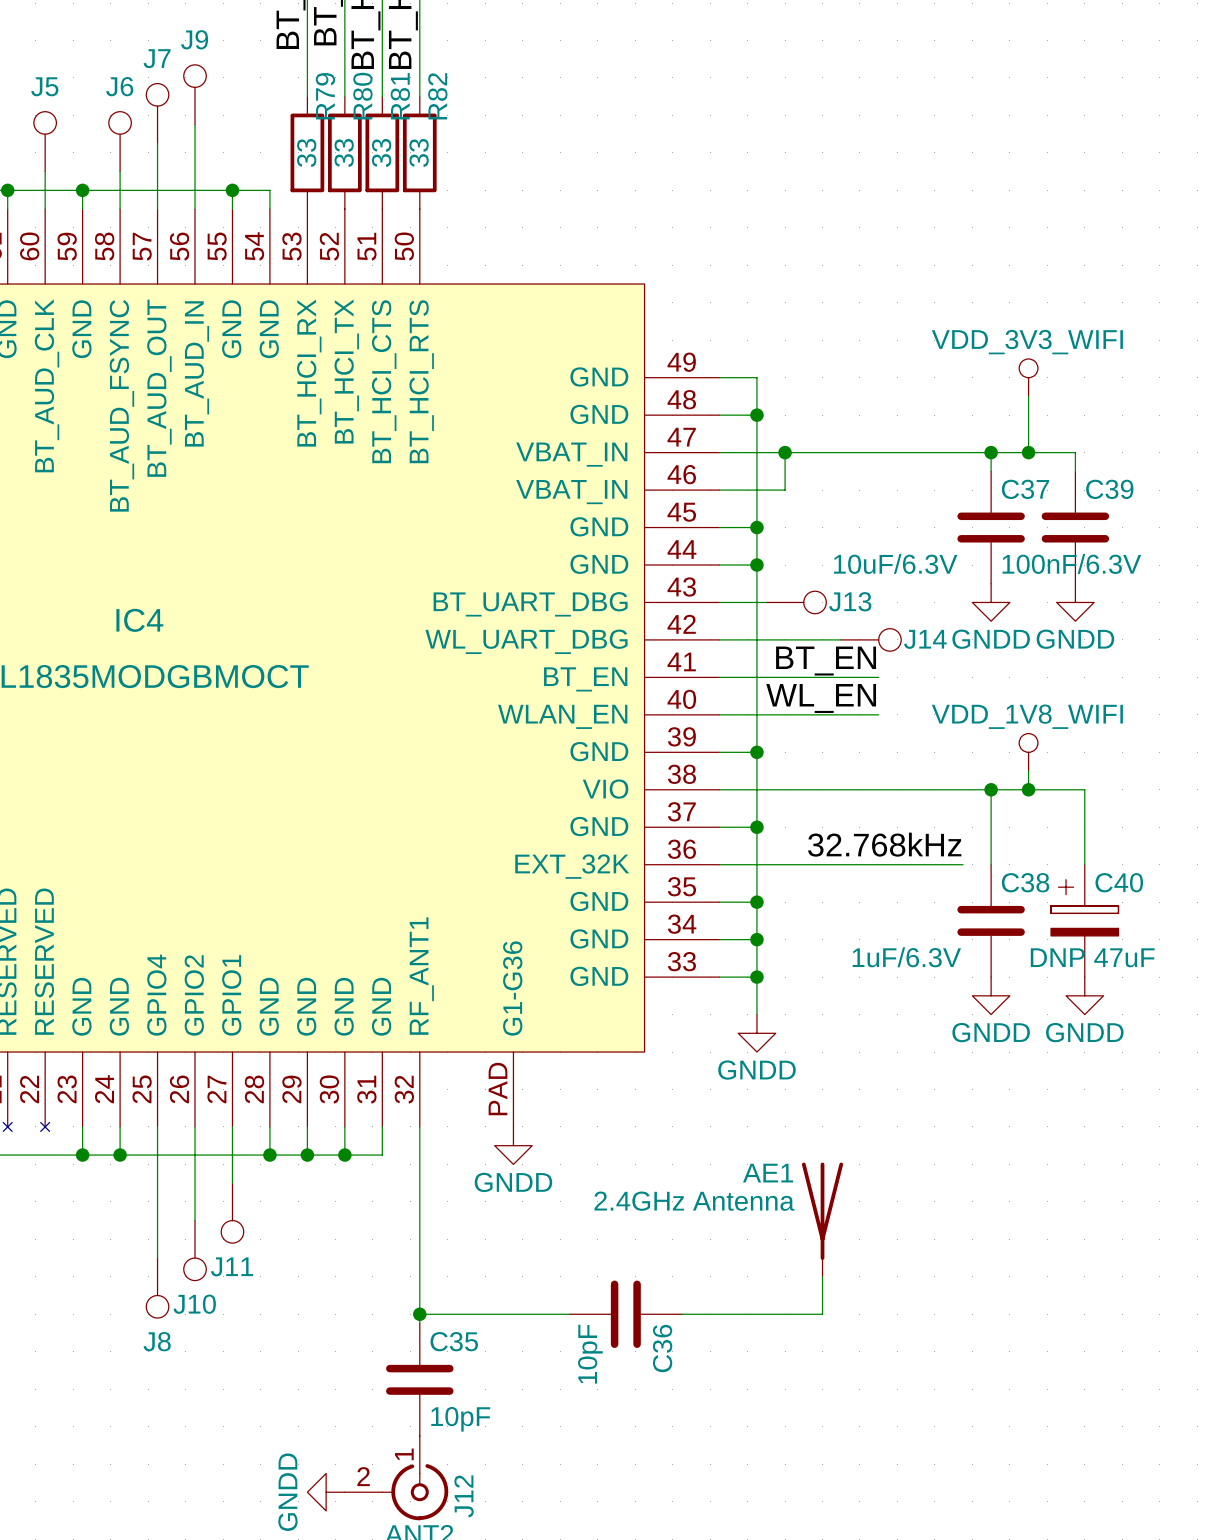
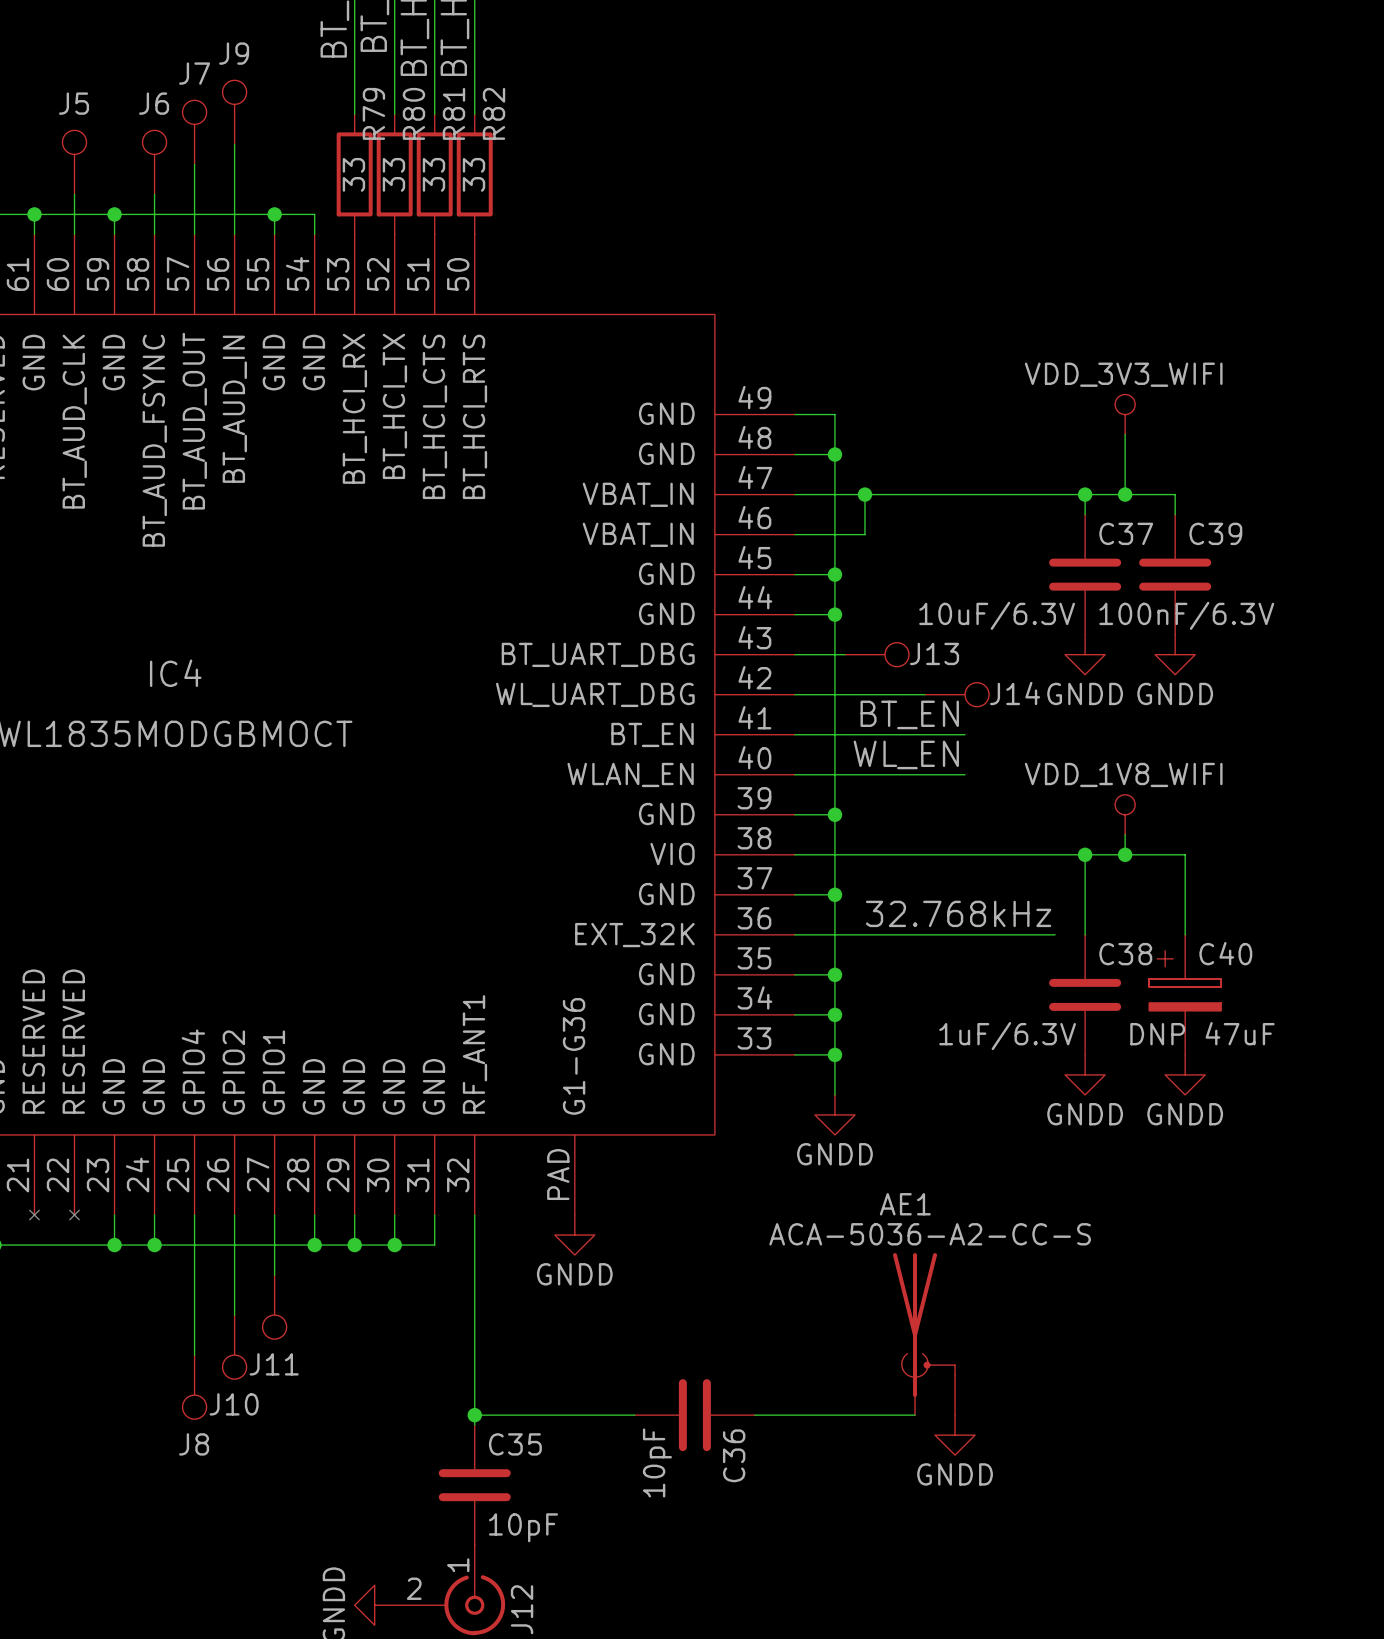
AE1 symbol: [801, 1162, 844, 1277] -> [893, 1253, 956, 1416]
AE1 name position: AE1 (768, 1173) -> AE1 (905, 1204)
AE1 value: 2.4GHz Antenna (694, 1201) -> ACA-5036-A2-CC-S (930, 1234)
wire: (822, 1276) (822, 1314) -> (915, 1415) (905, 1415)
power symbol: none -> GNDD (955, 1435)

